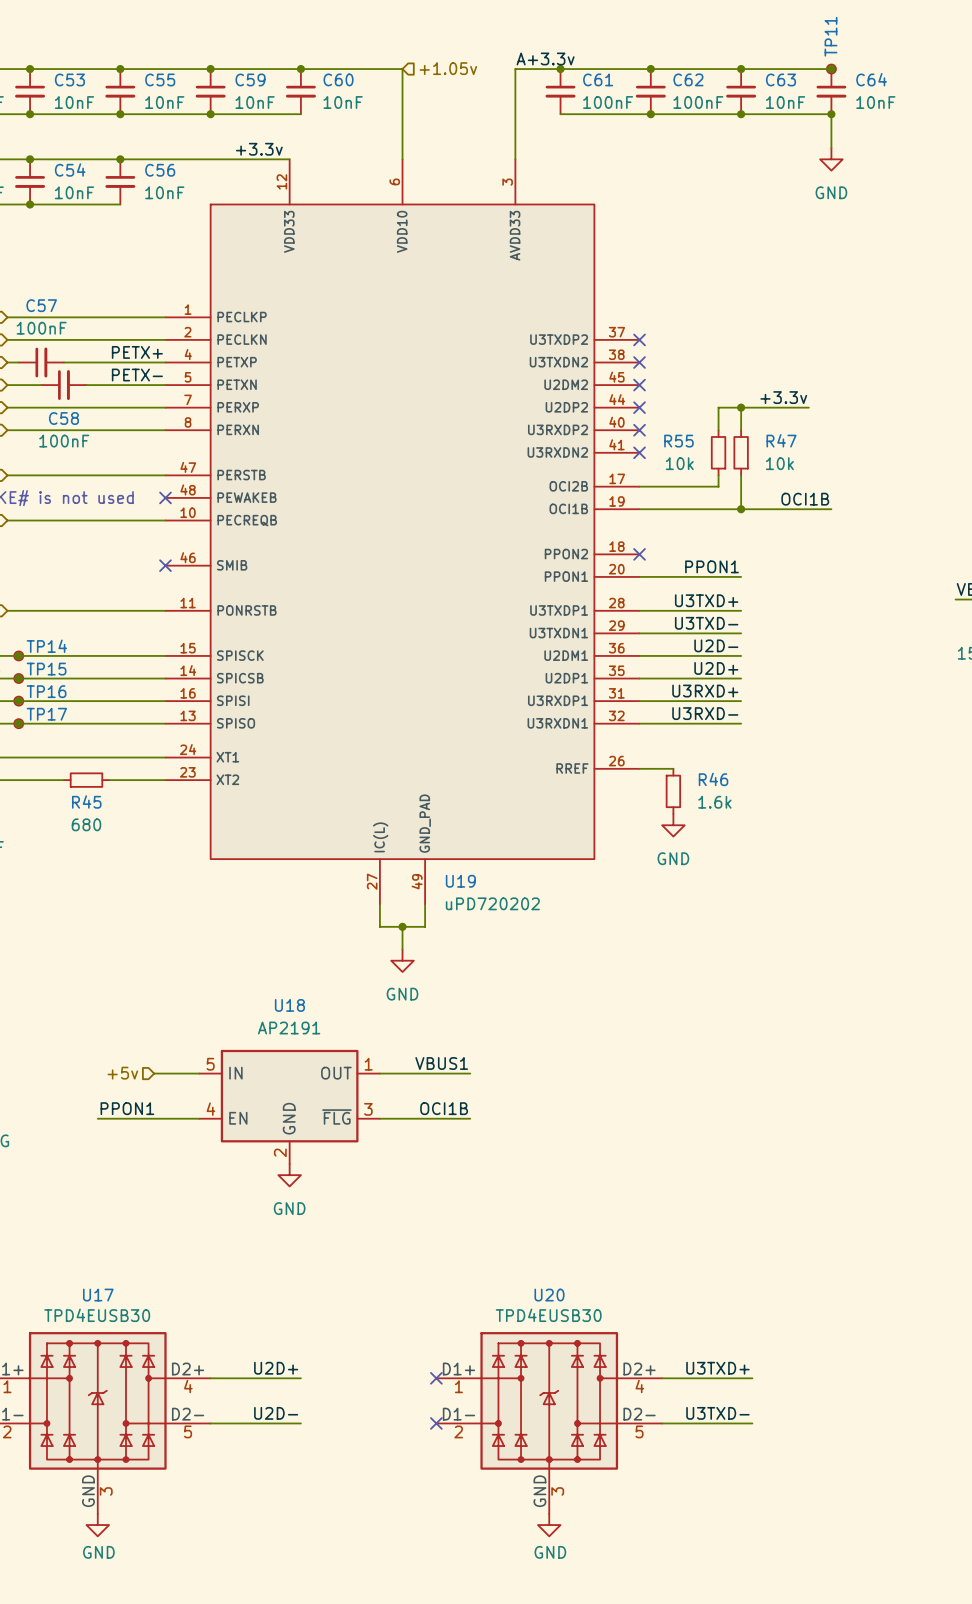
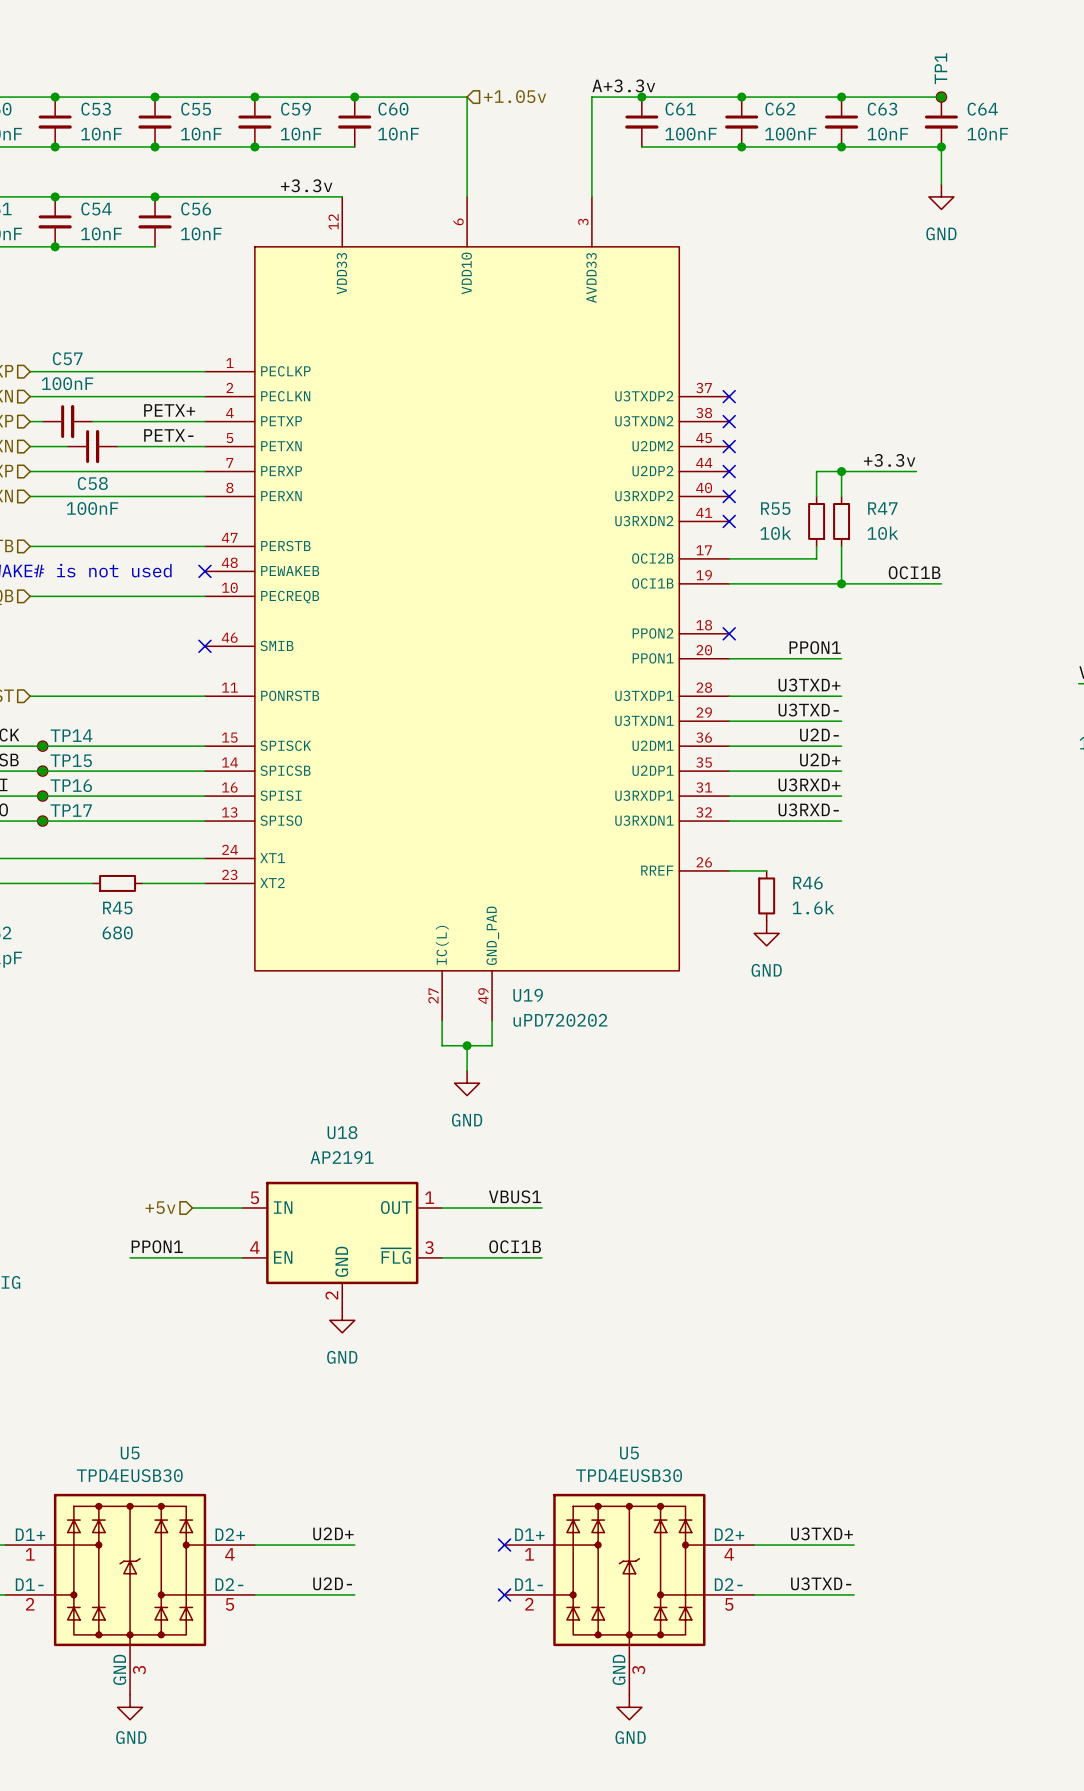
TP11 name: TP11 (830, 36) -> TP1 (940, 68)
U17 name: U17 (98, 1295) -> U5 (130, 1453)
U20 name: U20 (549, 1295) -> U5 (629, 1453)

